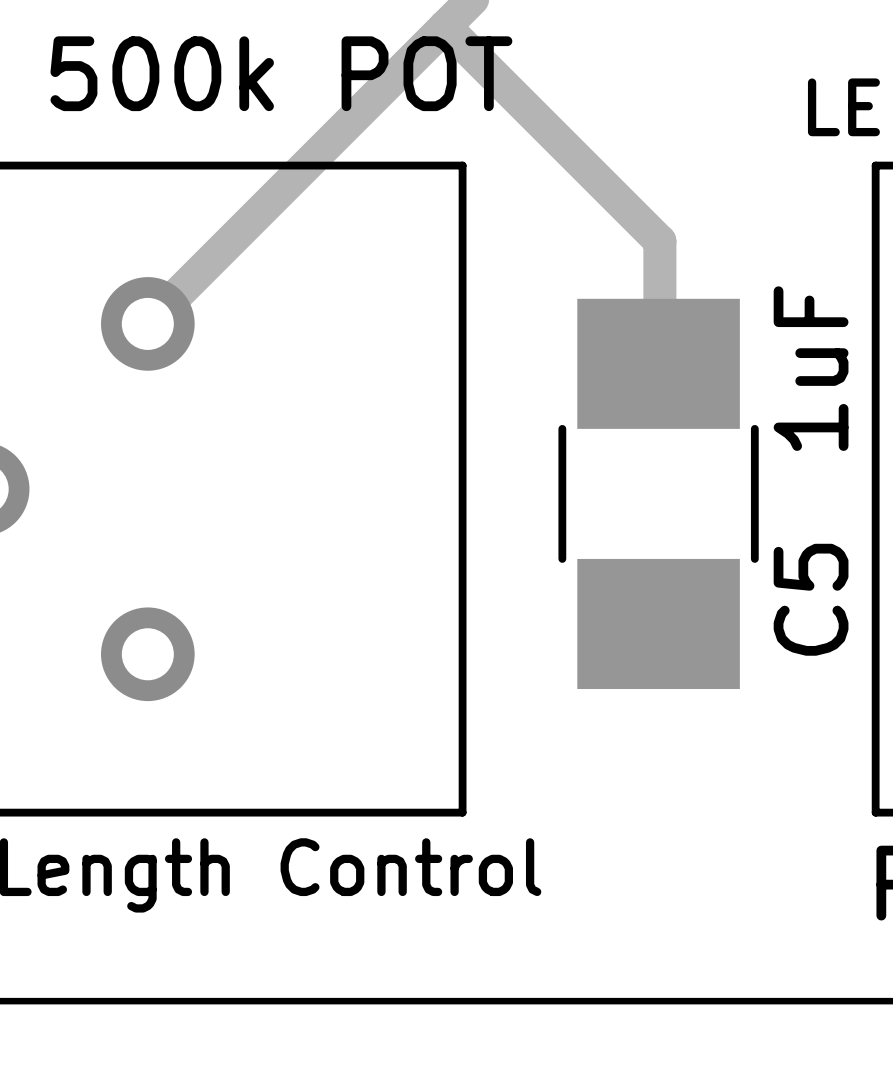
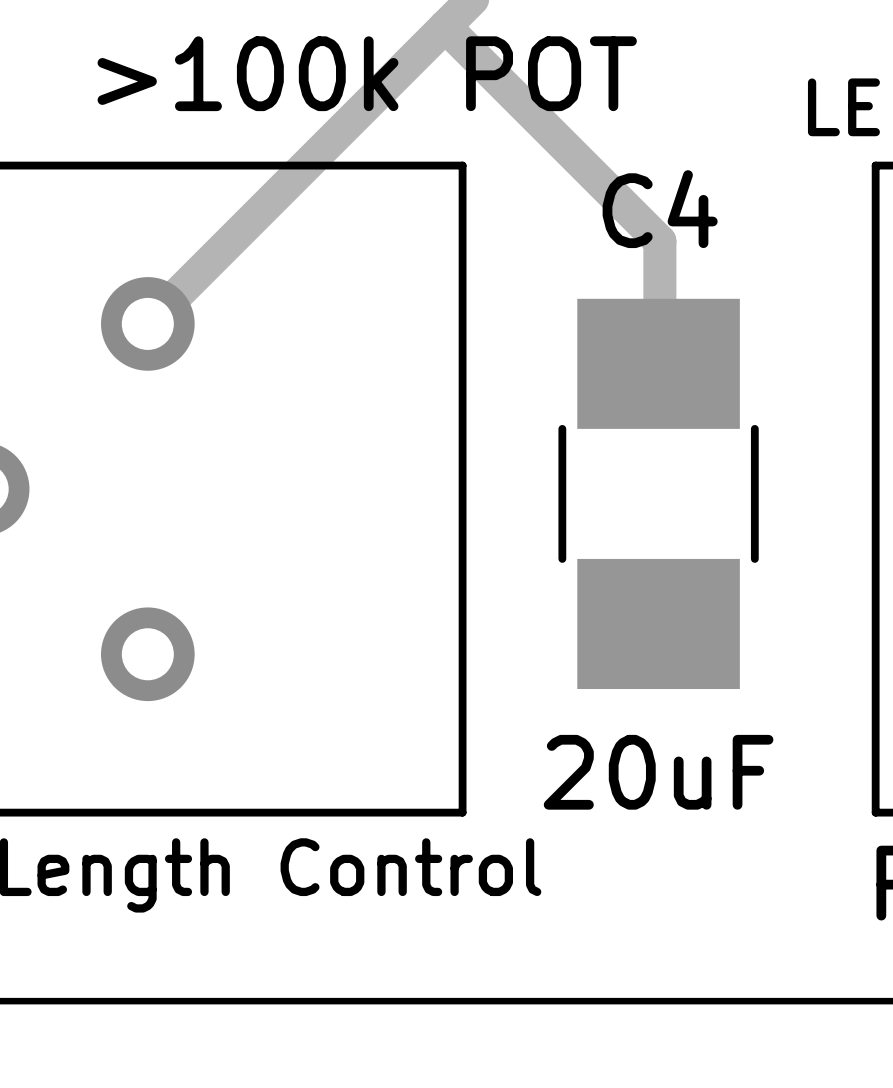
part value: 500k POT (281, 73) -> >100k POT (367, 73)
C5 value: 1uF (811, 368) -> 20uF (658, 772)
C5 name: C5 (811, 599) -> C4 (660, 209)

